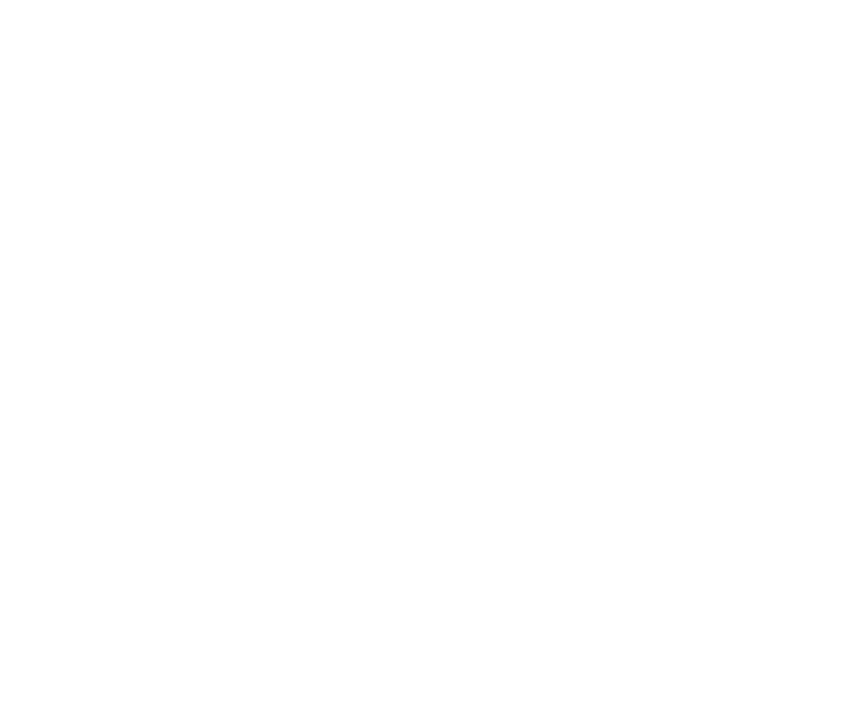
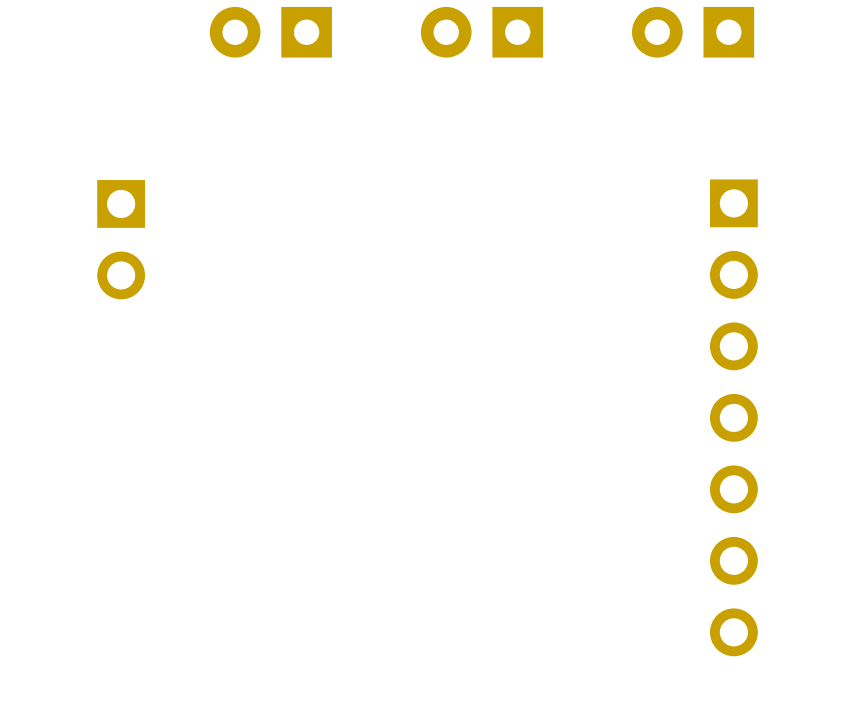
part: none -> (270, 32)
part: none -> (481, 32)
part: none -> (693, 32)
part: none -> (121, 239)
part: none -> (733, 417)

